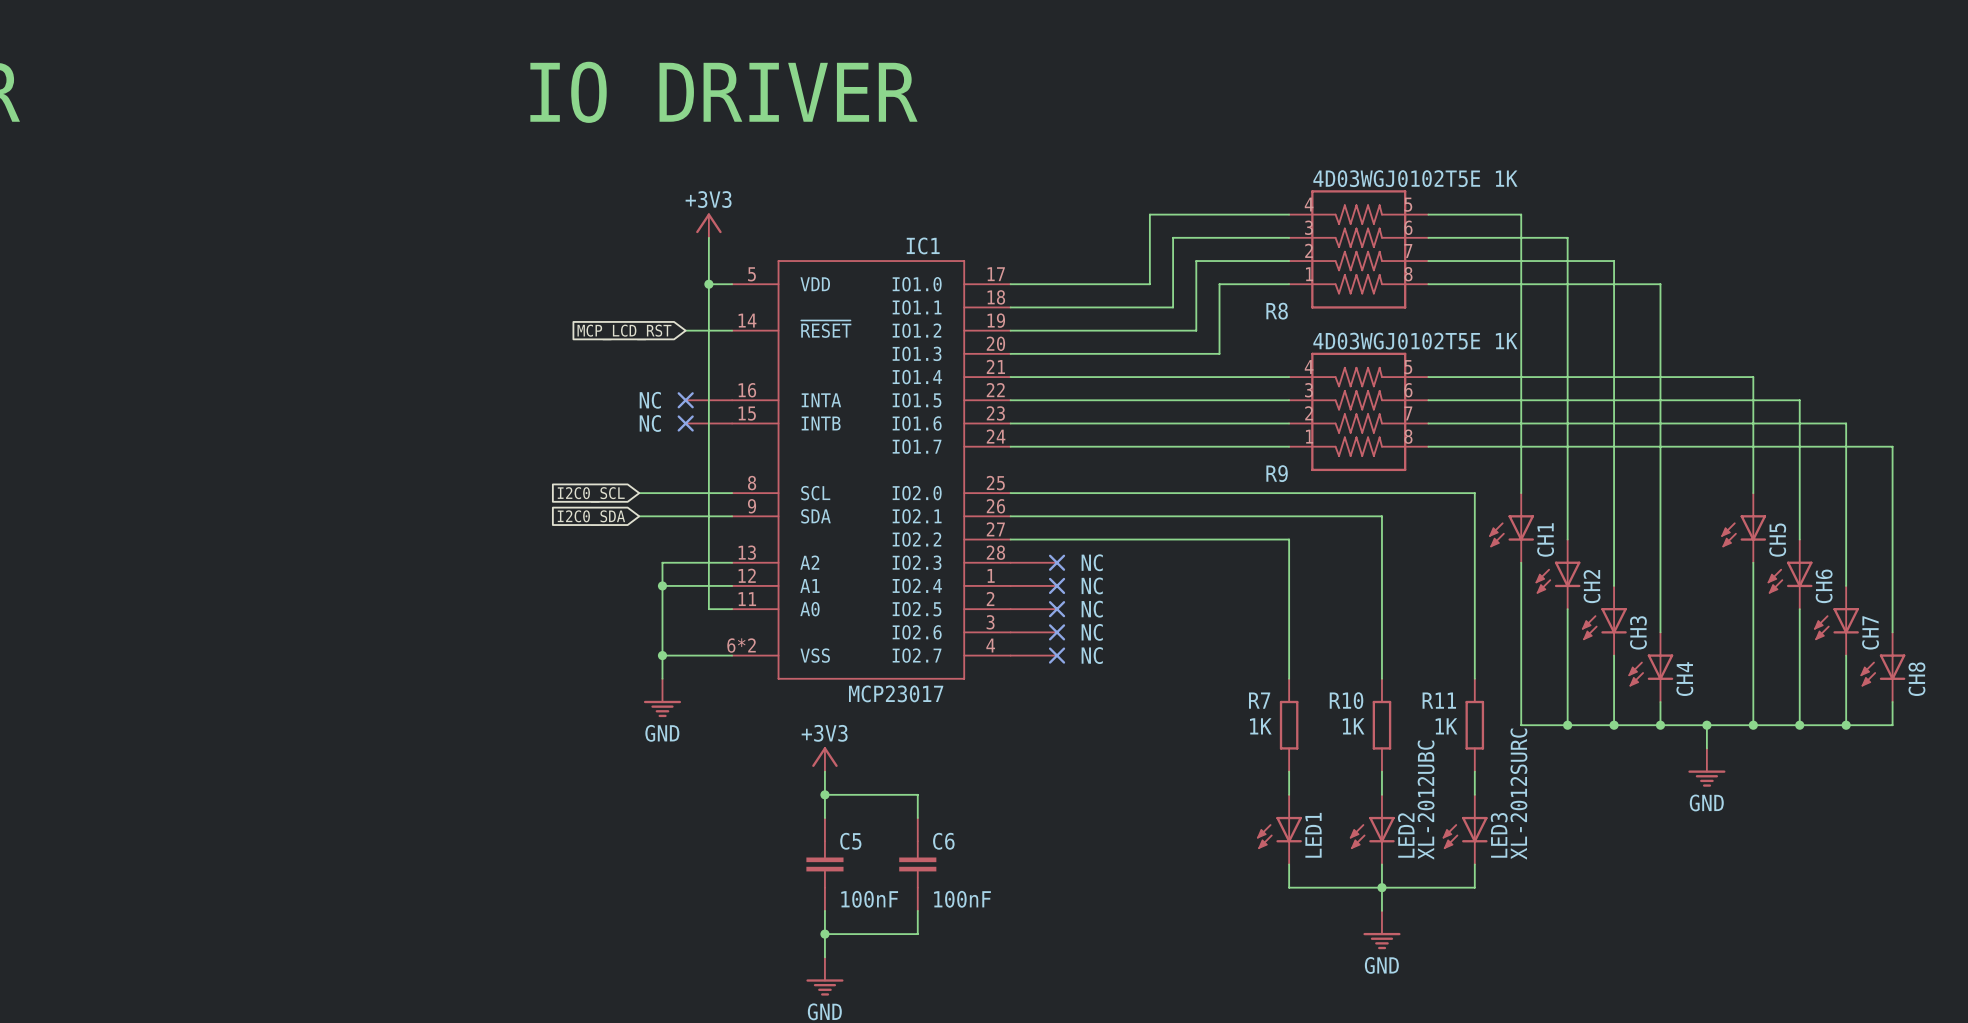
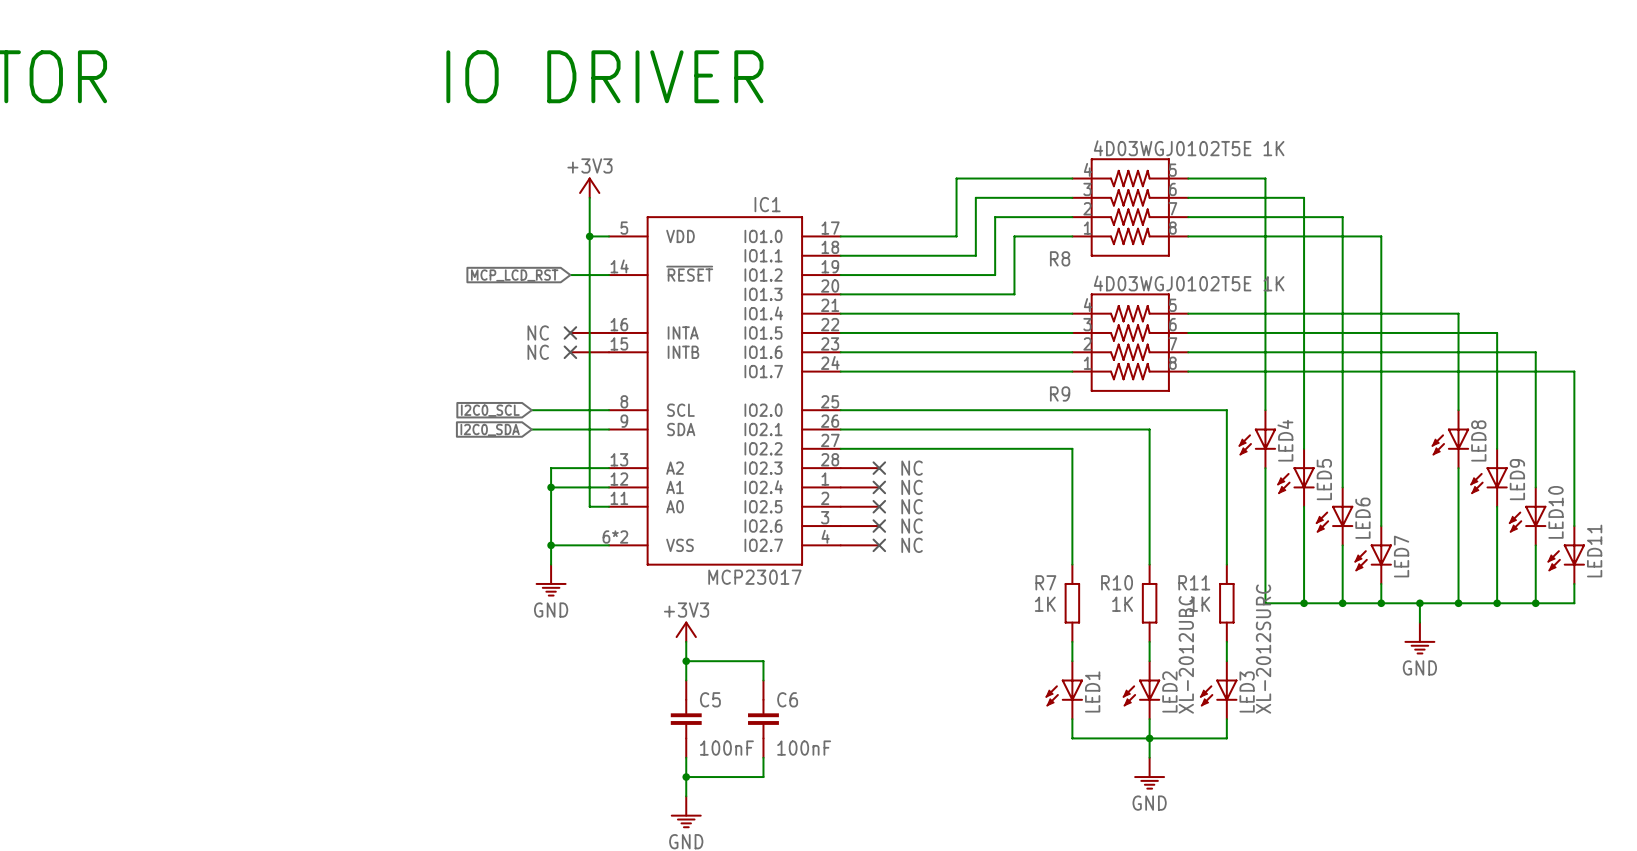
CH1 name: CH1 (1545, 539) -> LED4 (1285, 440)
CH5 name: CH5 (1777, 540) -> LED8 (1478, 440)
CH2 name: CH2 (1592, 586) -> LED5 (1324, 479)
CH6 name: CH6 (1824, 586) -> LED9 (1517, 479)
CH3 name: CH3 (1638, 632) -> LED6 (1362, 518)
CH7 name: CH7 (1870, 632) -> LED10 (1556, 512)
CH4 name: CH4 (1684, 679) -> LED7 (1401, 556)
CH8 name: CH8 (1916, 679) -> LED11 (1594, 551)

